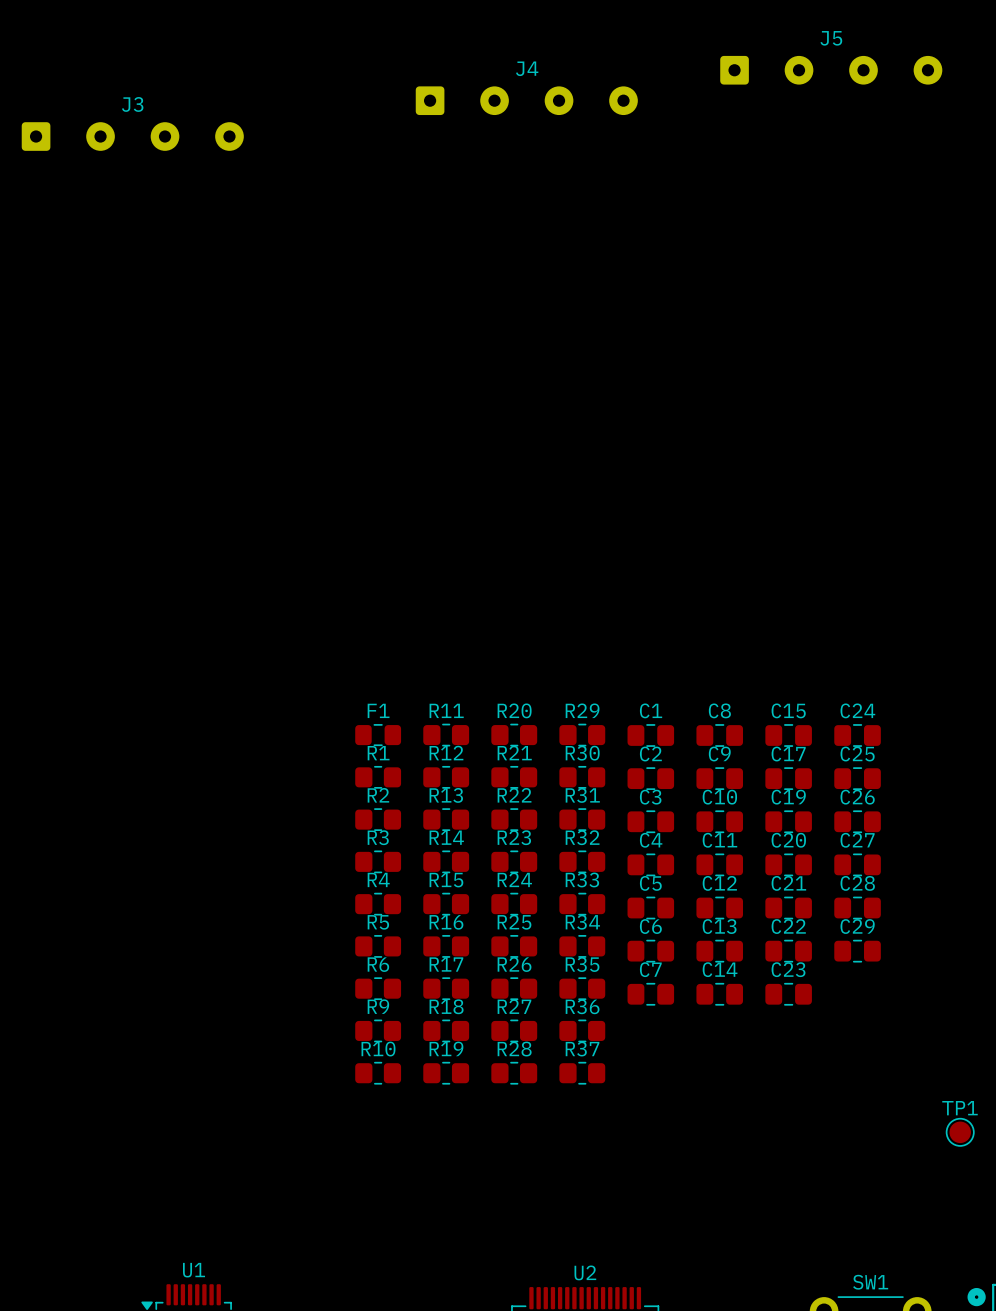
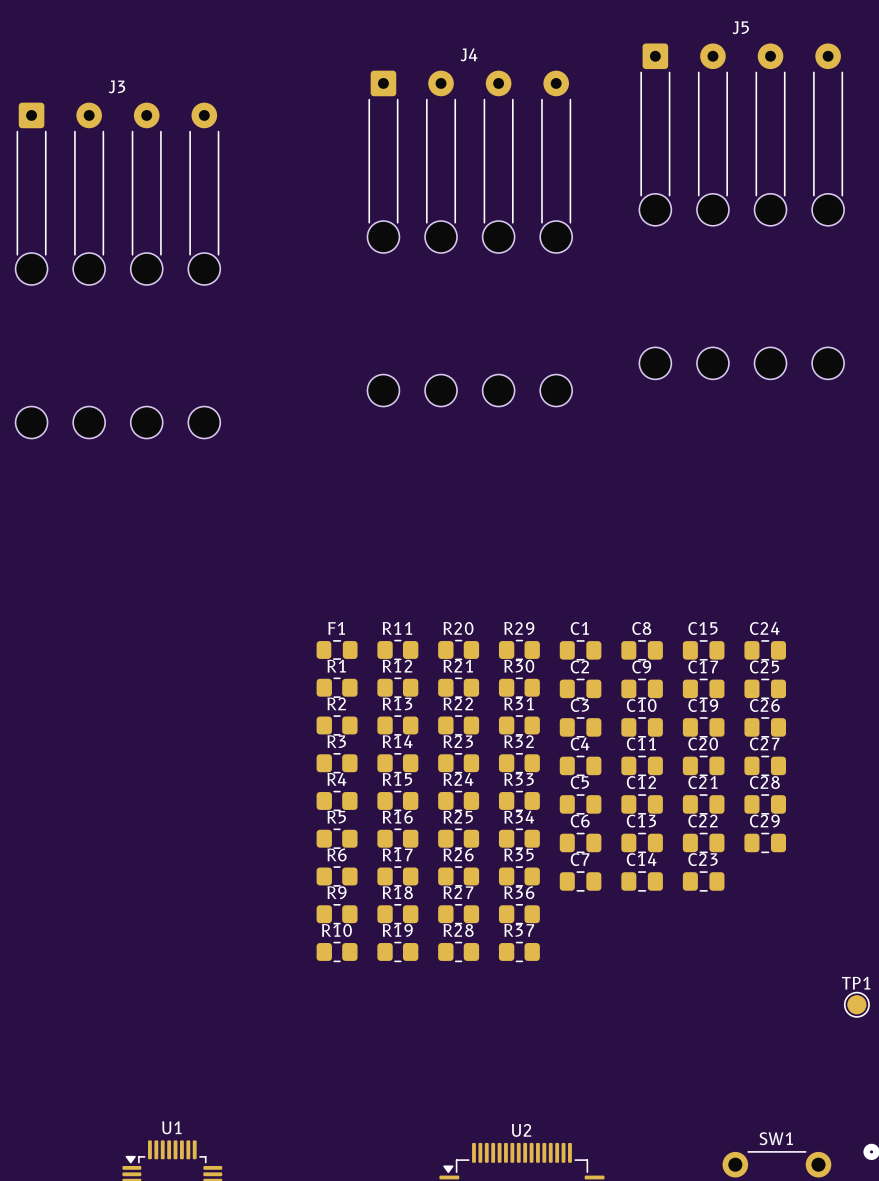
J5 footprint: [720, 55, 943, 85] -> [639, 43, 845, 380]
J4 footprint: [415, 86, 638, 116] -> [367, 70, 573, 407]
J3 footprint: [21, 122, 244, 151] -> [15, 102, 221, 439]

